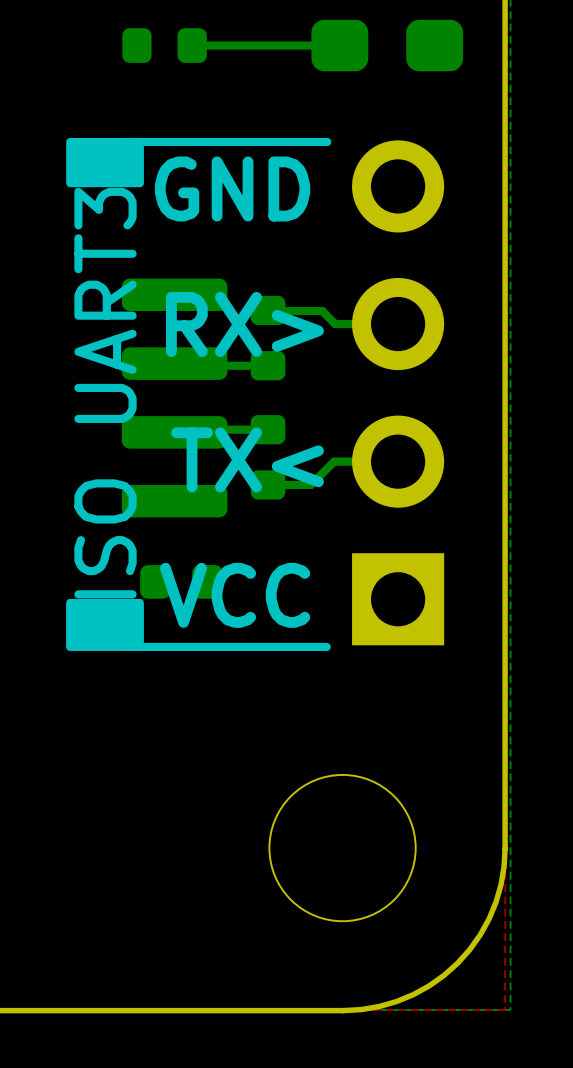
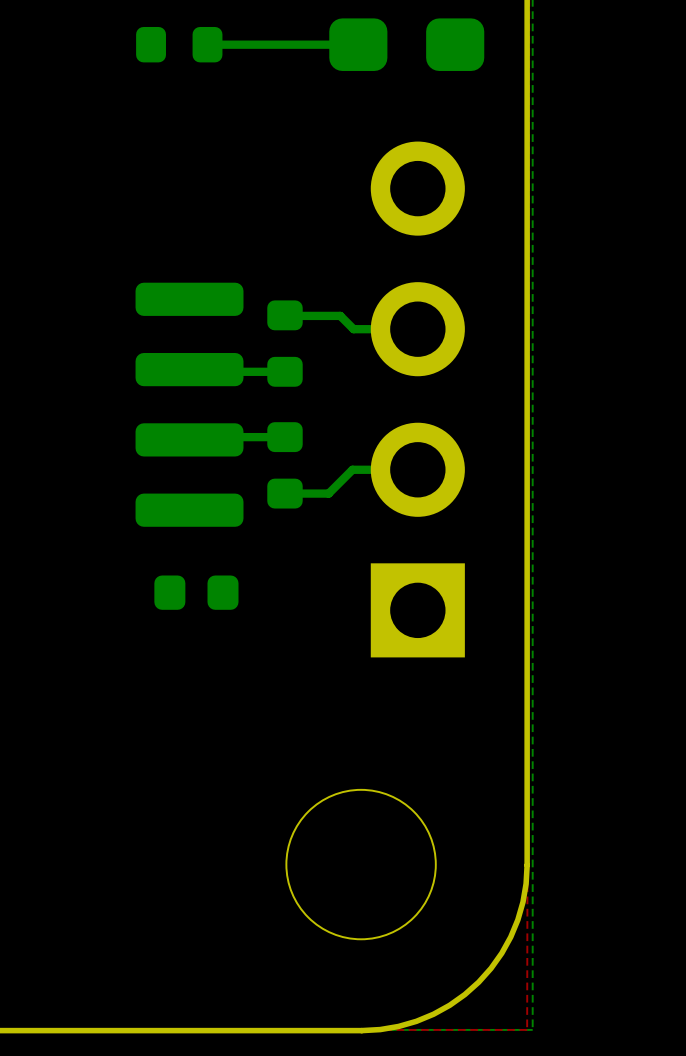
drawing: [66, 137, 144, 188] -> none
line: (122, 141) (327, 141) -> none
text: GND (232, 189) -> none
text: RX> (244, 324) -> none
text: ISO UART3 (105, 393) -> none
text: TX< (247, 459) -> none
text: VCC (235, 595) -> none
drawing: [66, 598, 144, 651] -> none
line: (122, 646) (326, 646) -> none

